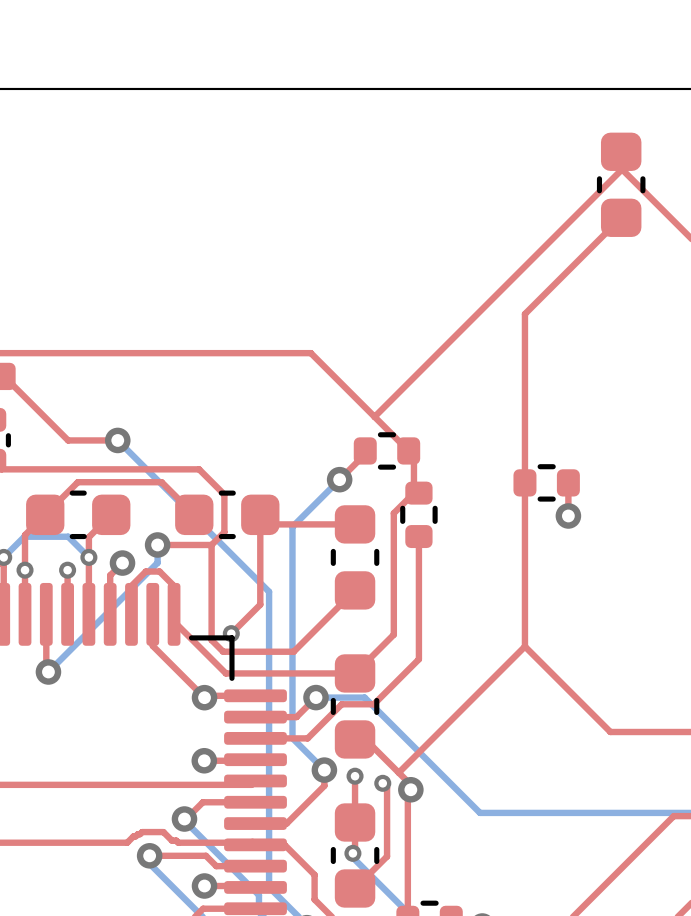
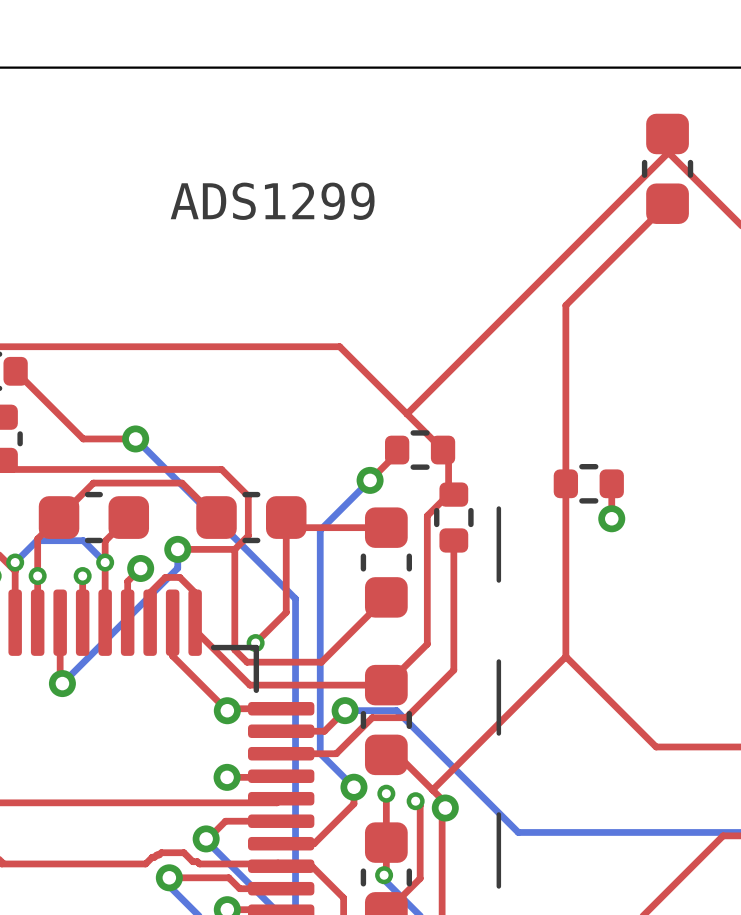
text: none -> ADS1299 (272, 201)
line: none -> (498, 508) (498, 580)
line: none -> (498, 661) (498, 733)
line: none -> (498, 814) (498, 886)

